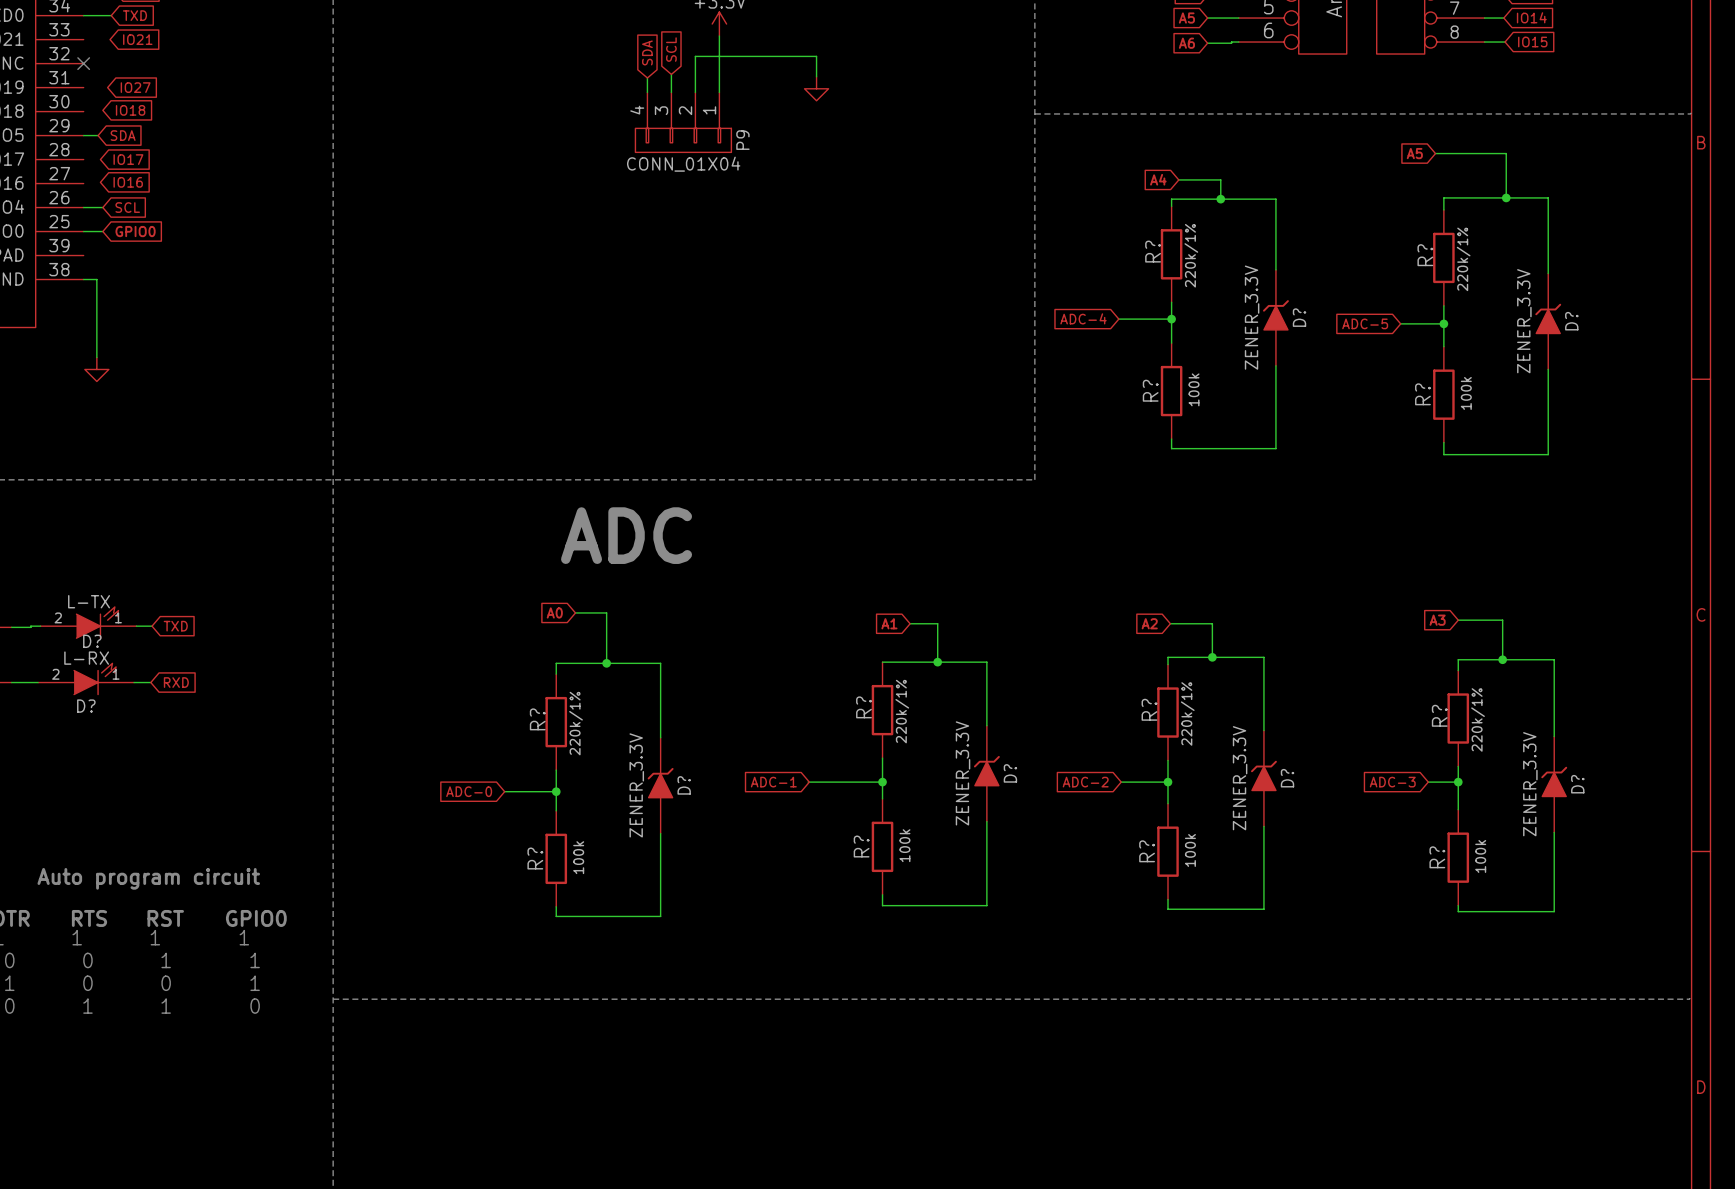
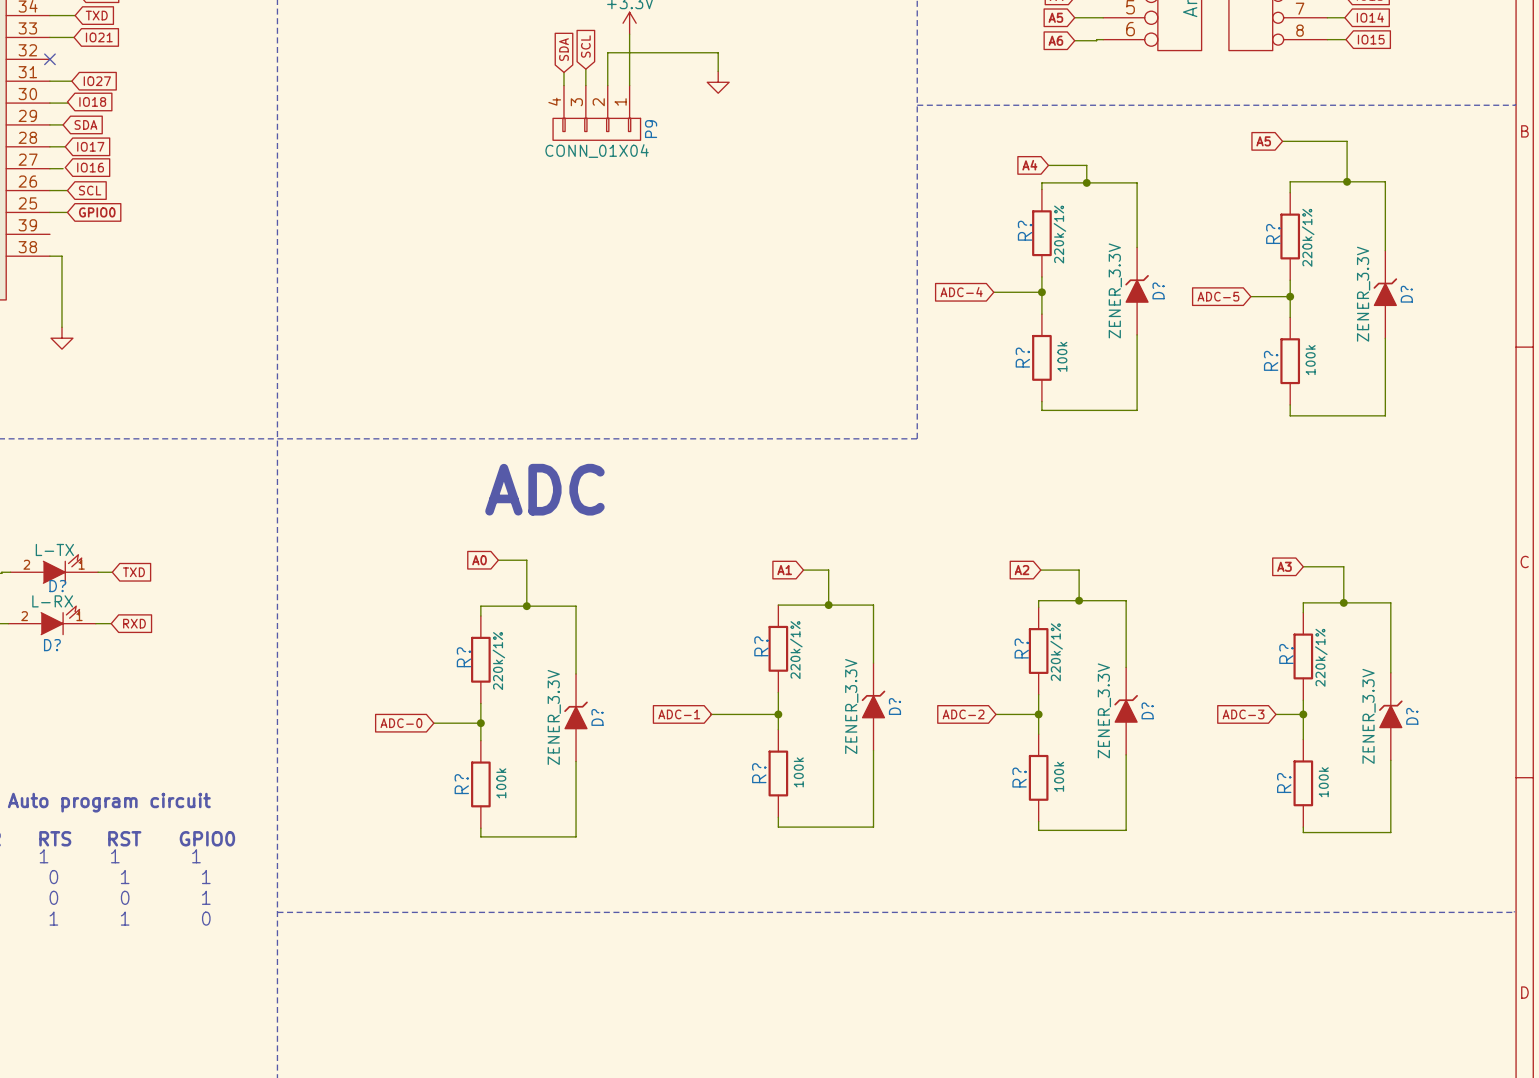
wire: none -> (49, 37) (74, 37)
wire: none -> (49, 81) (71, 81)
wire: none -> (49, 103) (68, 103)
wire: none -> (49, 146) (65, 146)
wire: none -> (49, 168) (63, 168)

